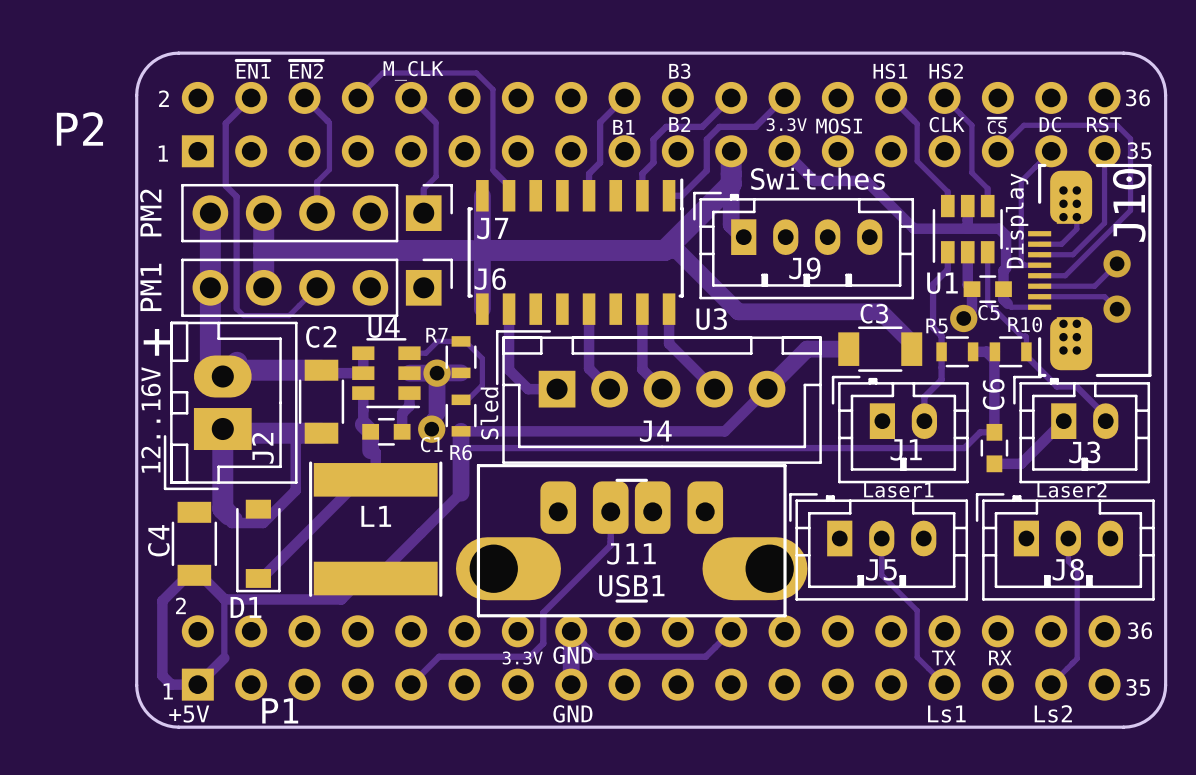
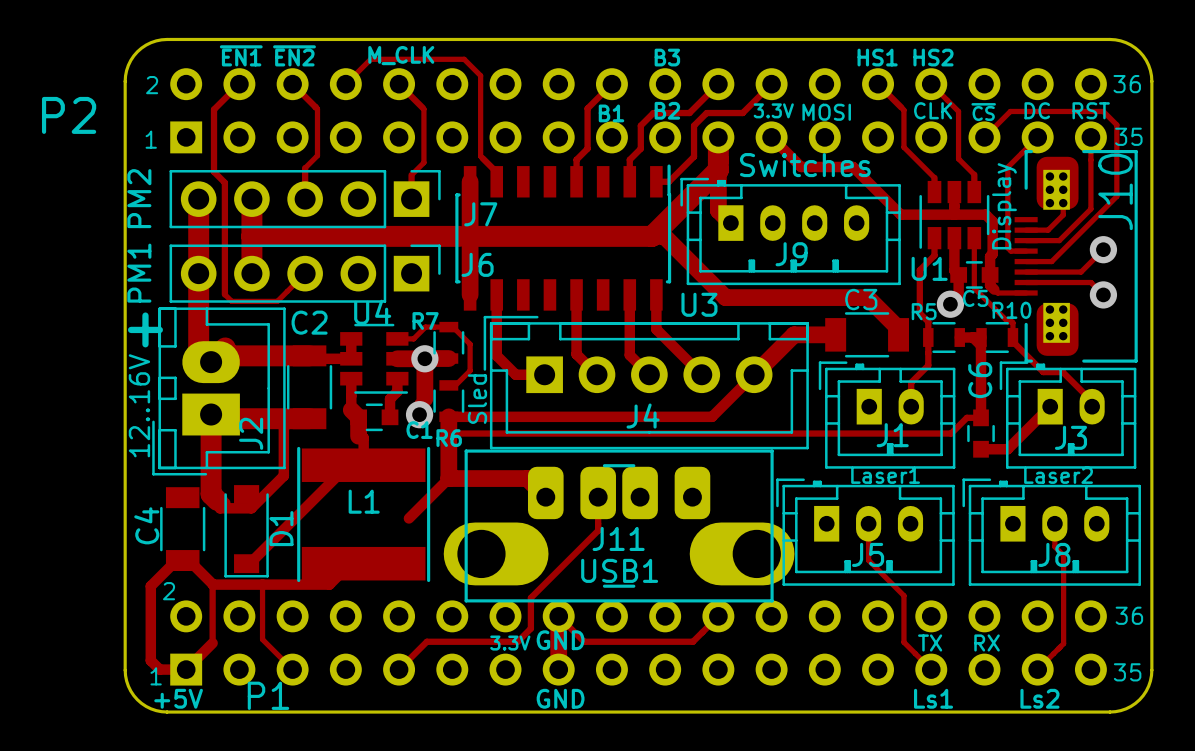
track: none -> (448, 478) (527, 478) (545, 497)
track: (421, 533) (375, 578) -> none
track: none -> (262, 584) (262, 639) (292, 669)
D1 name rotation: 0° (245, 607) -> 90° counterclockwise (281, 528)
D1 name position: D1 (245, 607) -> D1 (281, 528)

